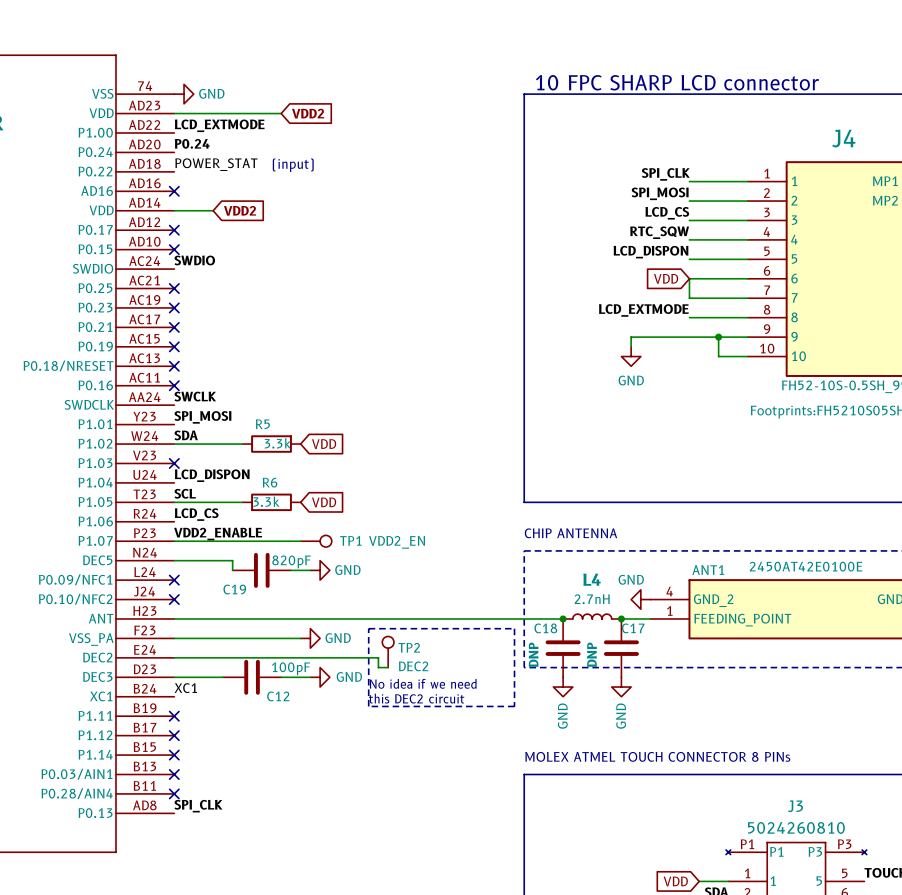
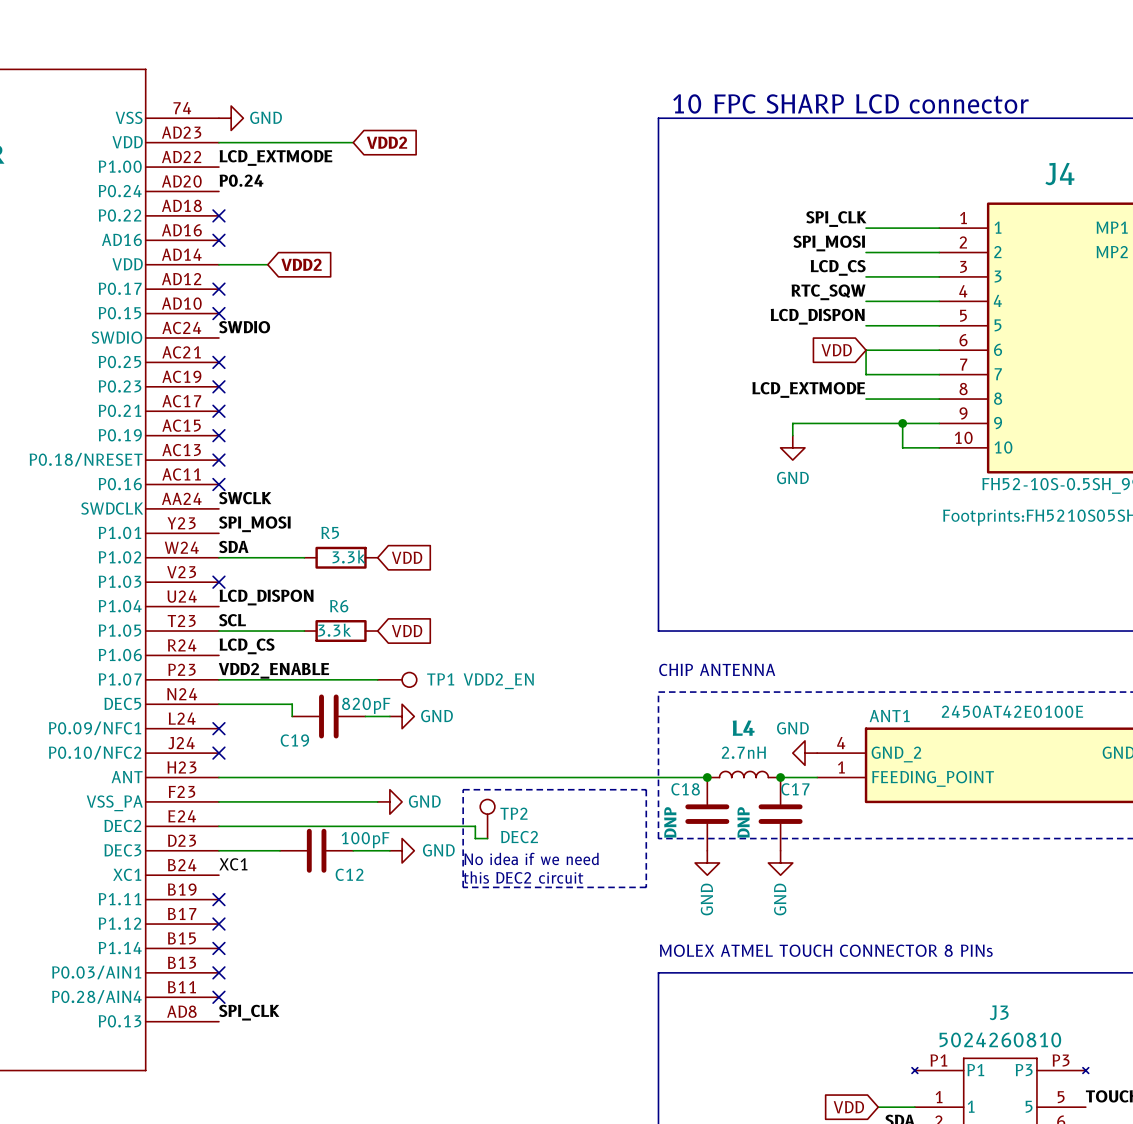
label: POWER_STAT (216, 164) -> none
text: (input) (293, 165) -> none
no-connect mark: none -> (218, 215)

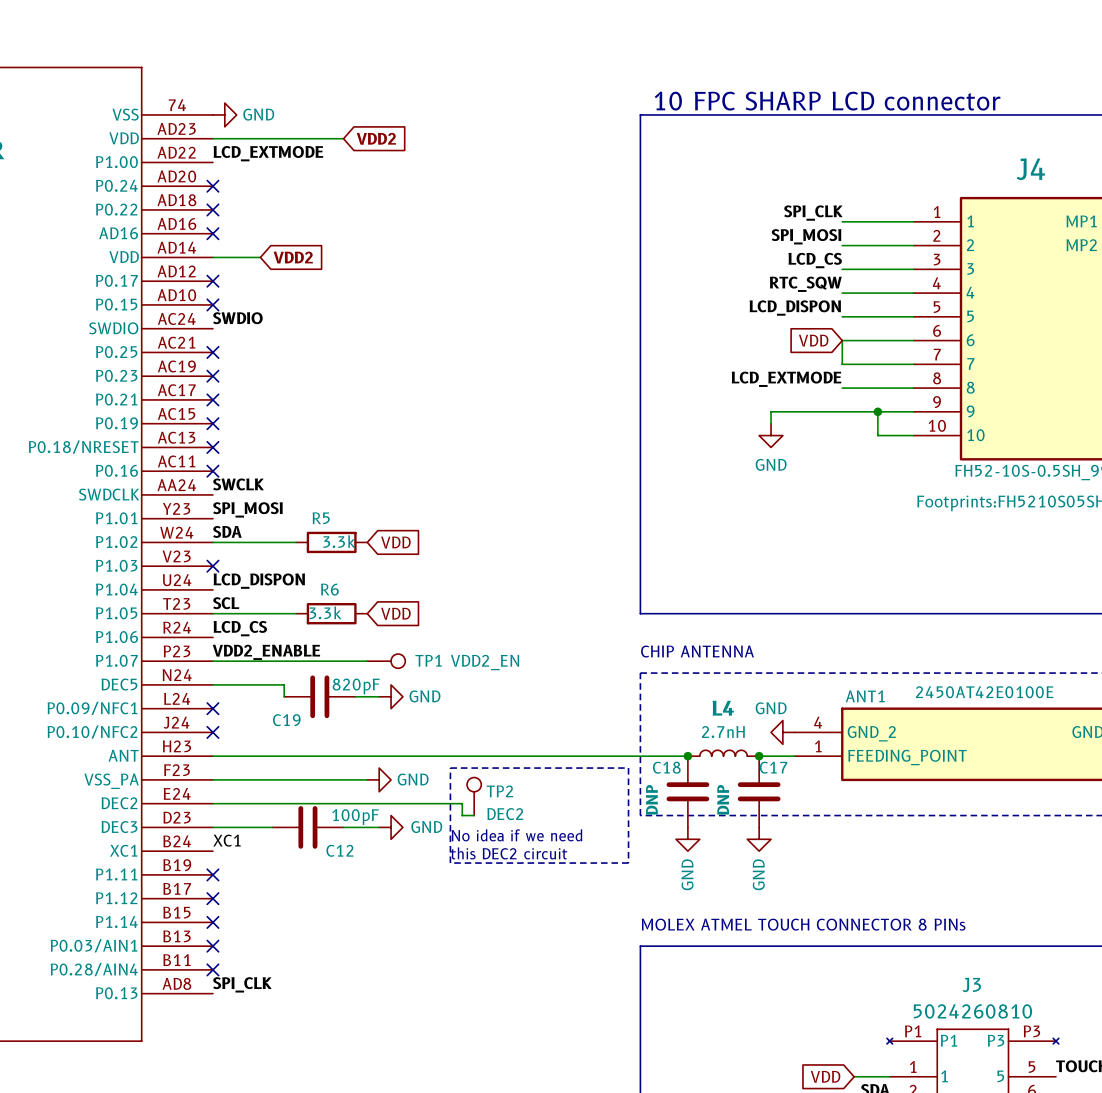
label: P0.24 (241, 180) -> none
no-connect mark: none -> (212, 186)

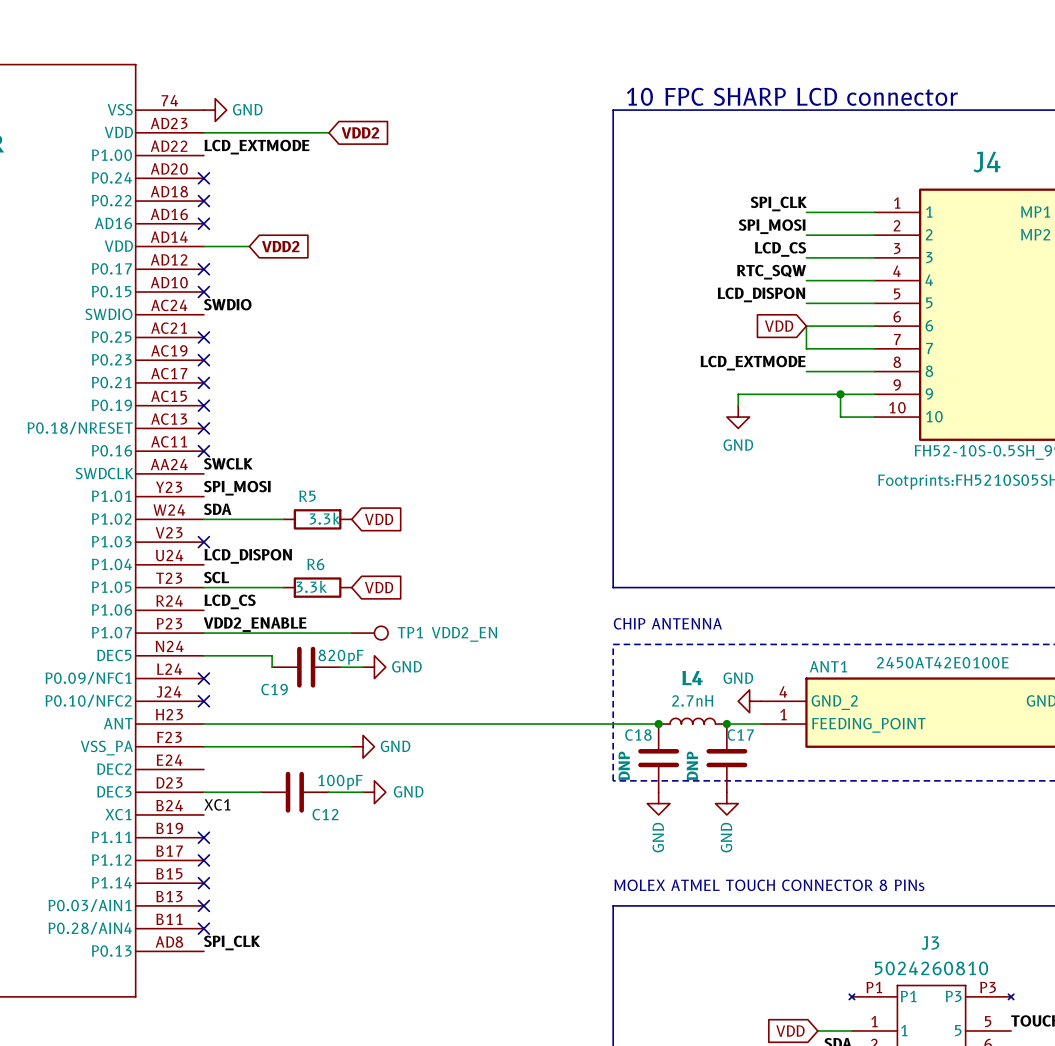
line: (450, 768) (628, 768) (628, 863) (450, 863) (450, 768) -> none
TP2: DEC2 (474, 796) -> none
wire: (212, 803) (462, 803) (462, 815) (474, 815) -> none
text: No idea if we need (517, 835) -> none
text: this DEC2 circuit (509, 853) -> none

